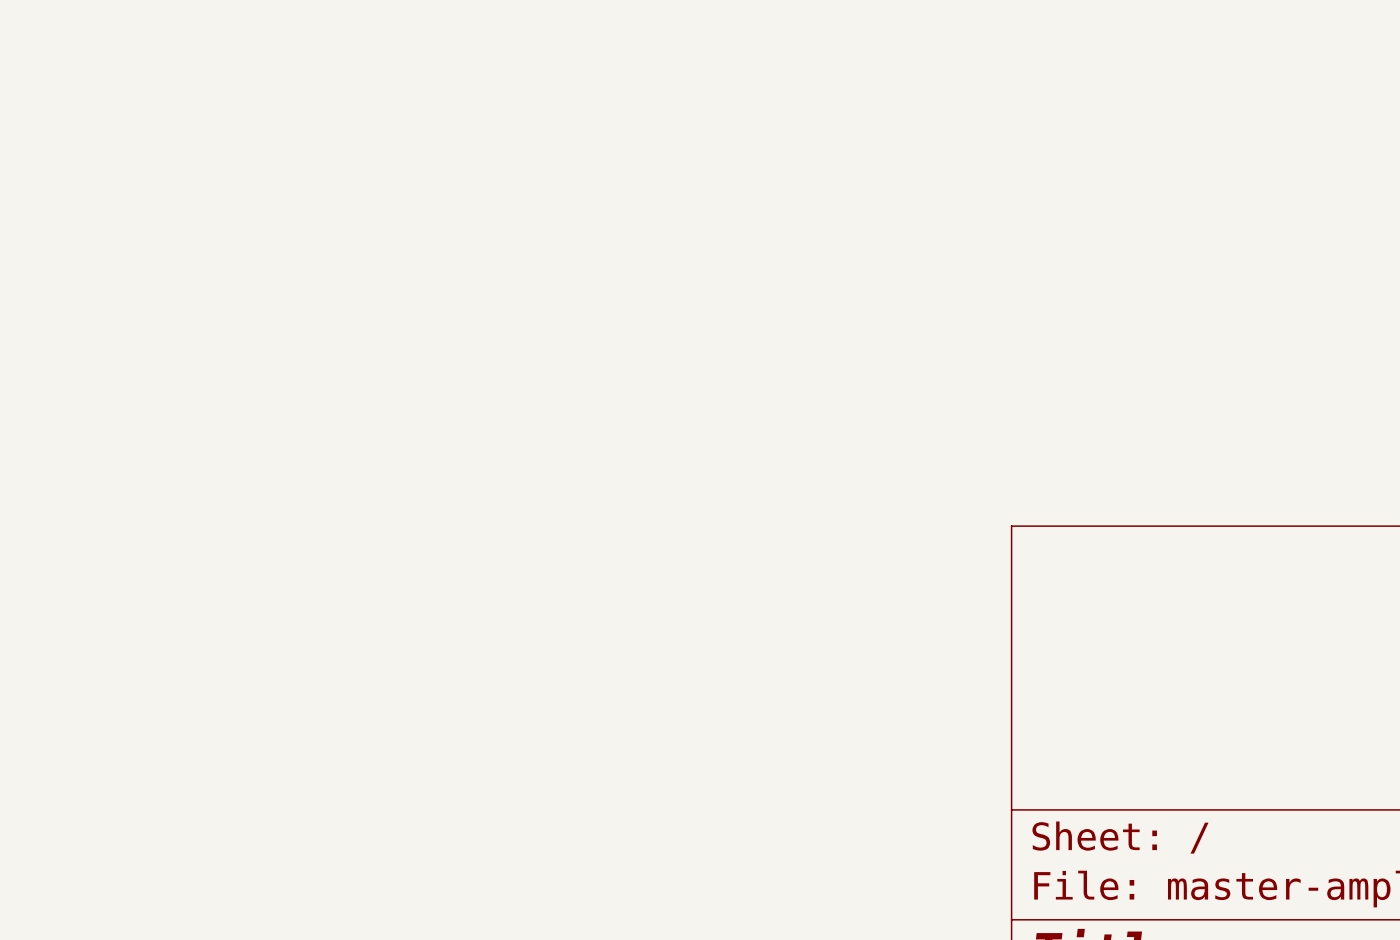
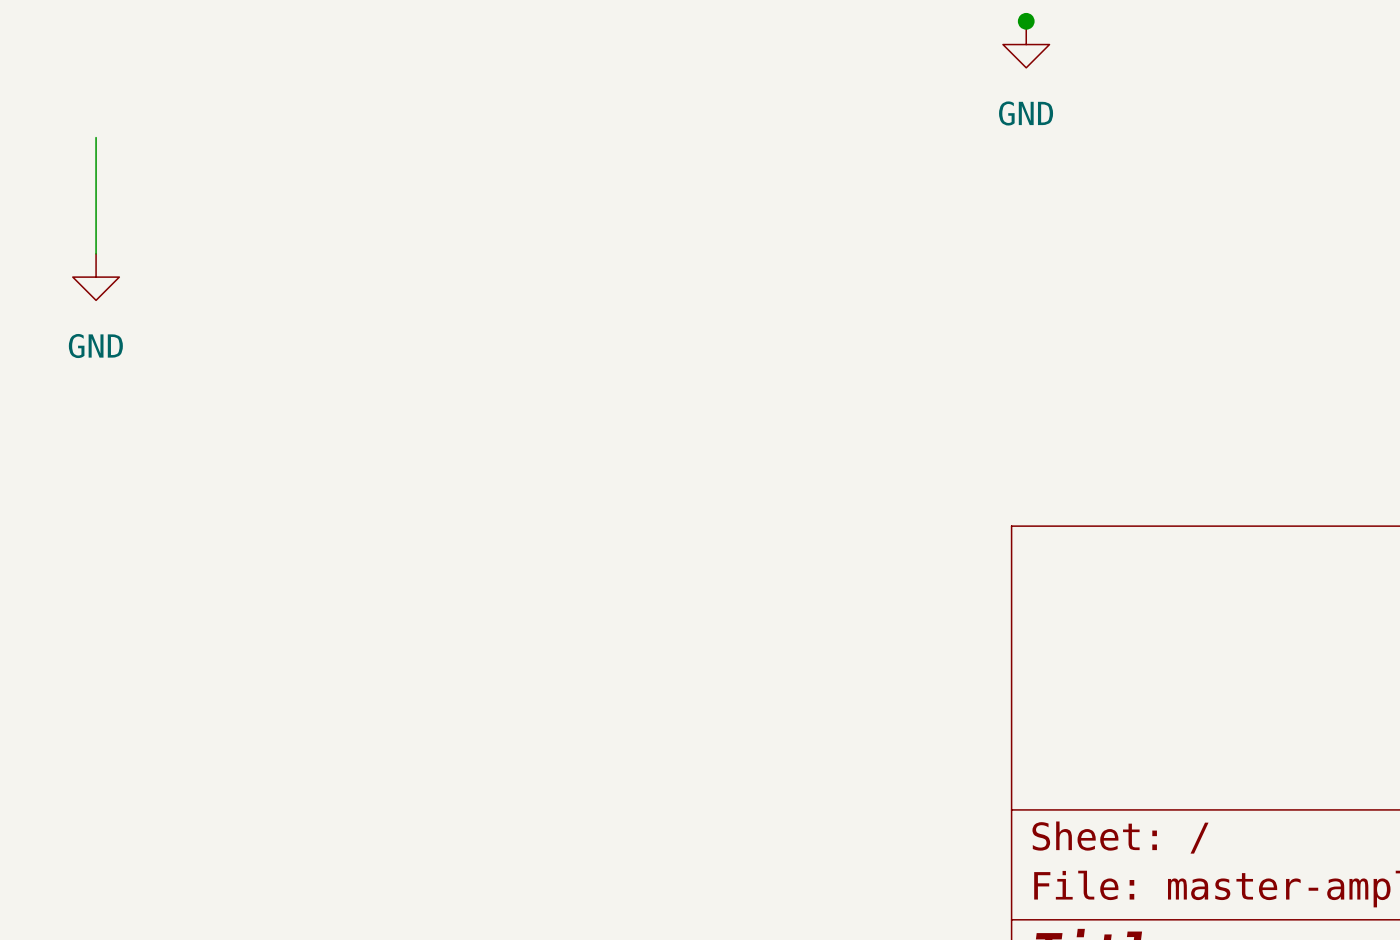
junction: none -> (1026, 21)
power symbol: none -> GND (1026, 44)
wire: none -> (96, 137) (96, 253)
power symbol: none -> GND (96, 277)

